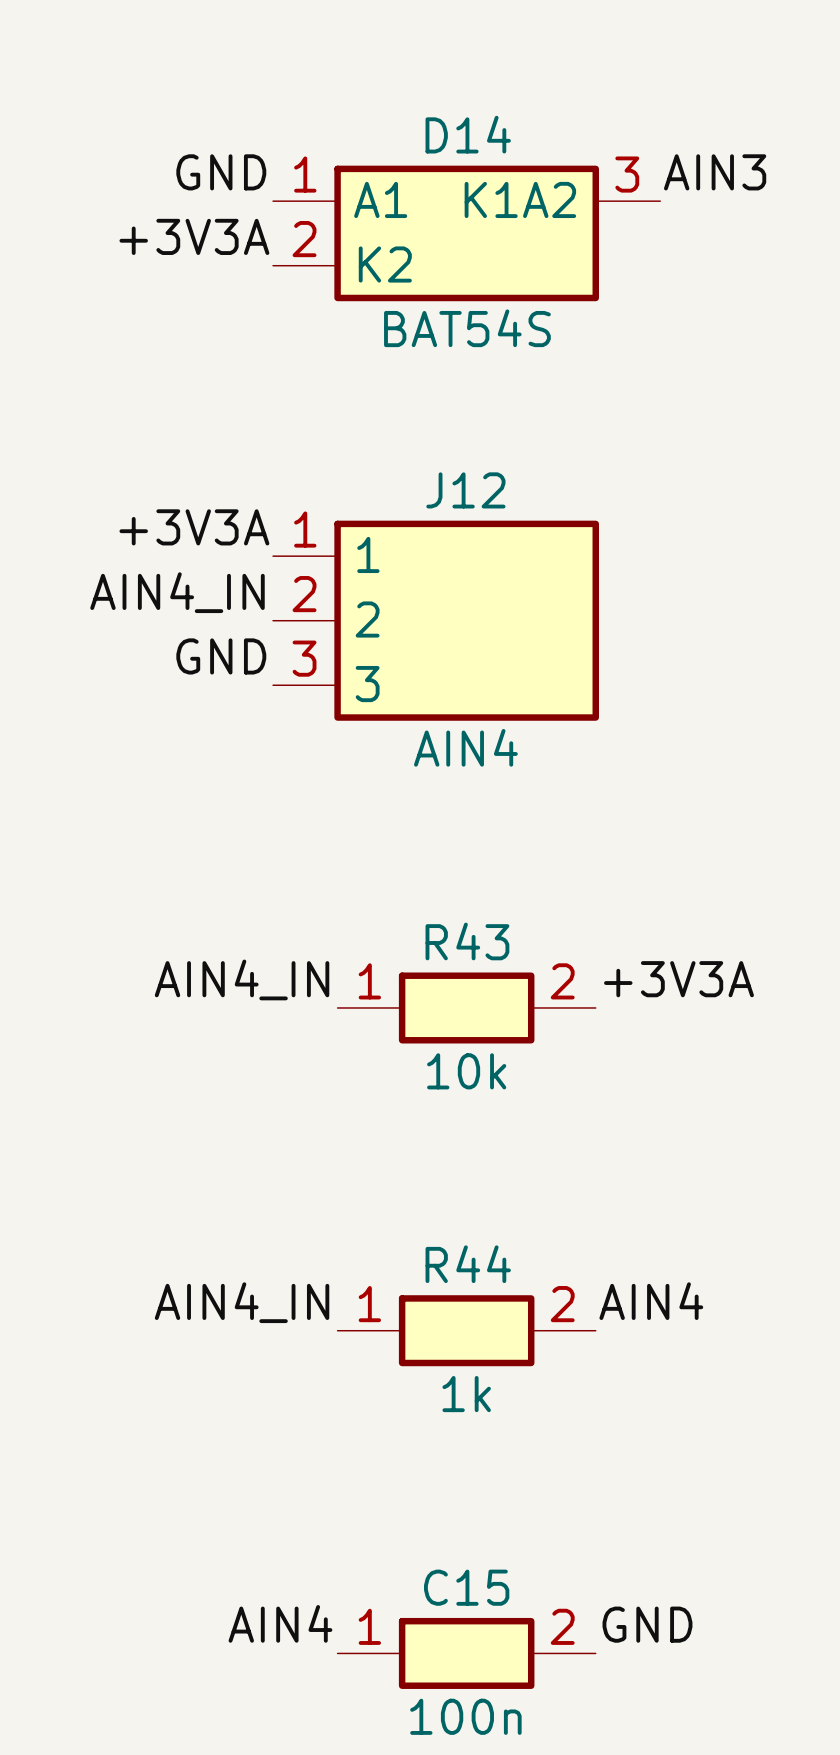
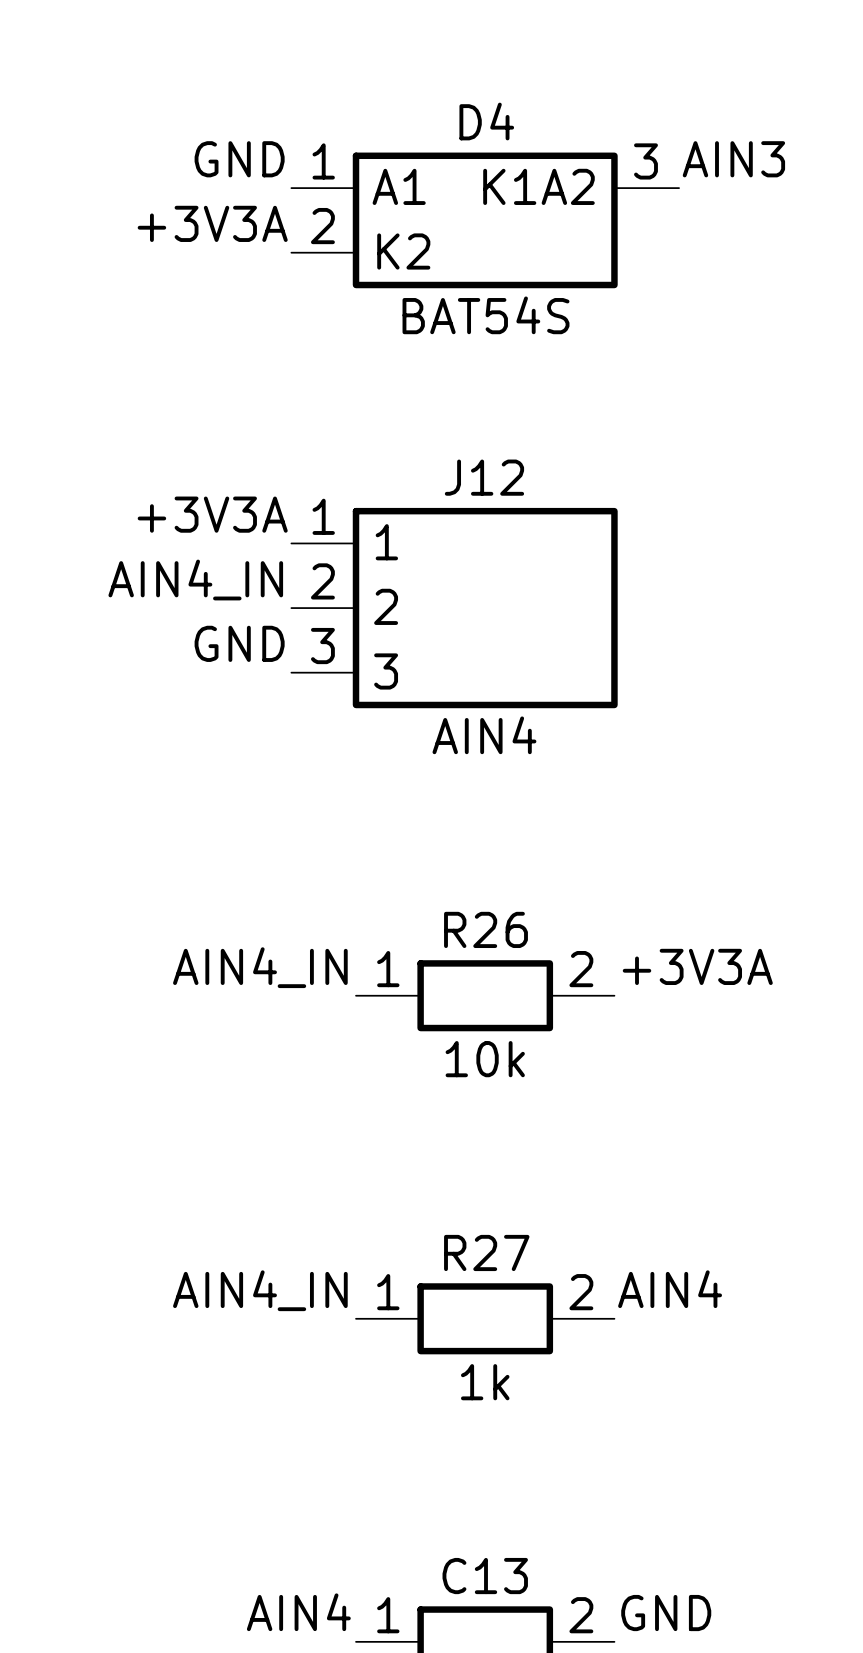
D14 name: D14 (468, 134) -> D4 (486, 121)
R43 name: R43 (467, 941) -> R26 (486, 929)
R44 name: R44 (468, 1264) -> R27 (486, 1252)
C15 name: C15 (466, 1587) -> C13 (485, 1576)

